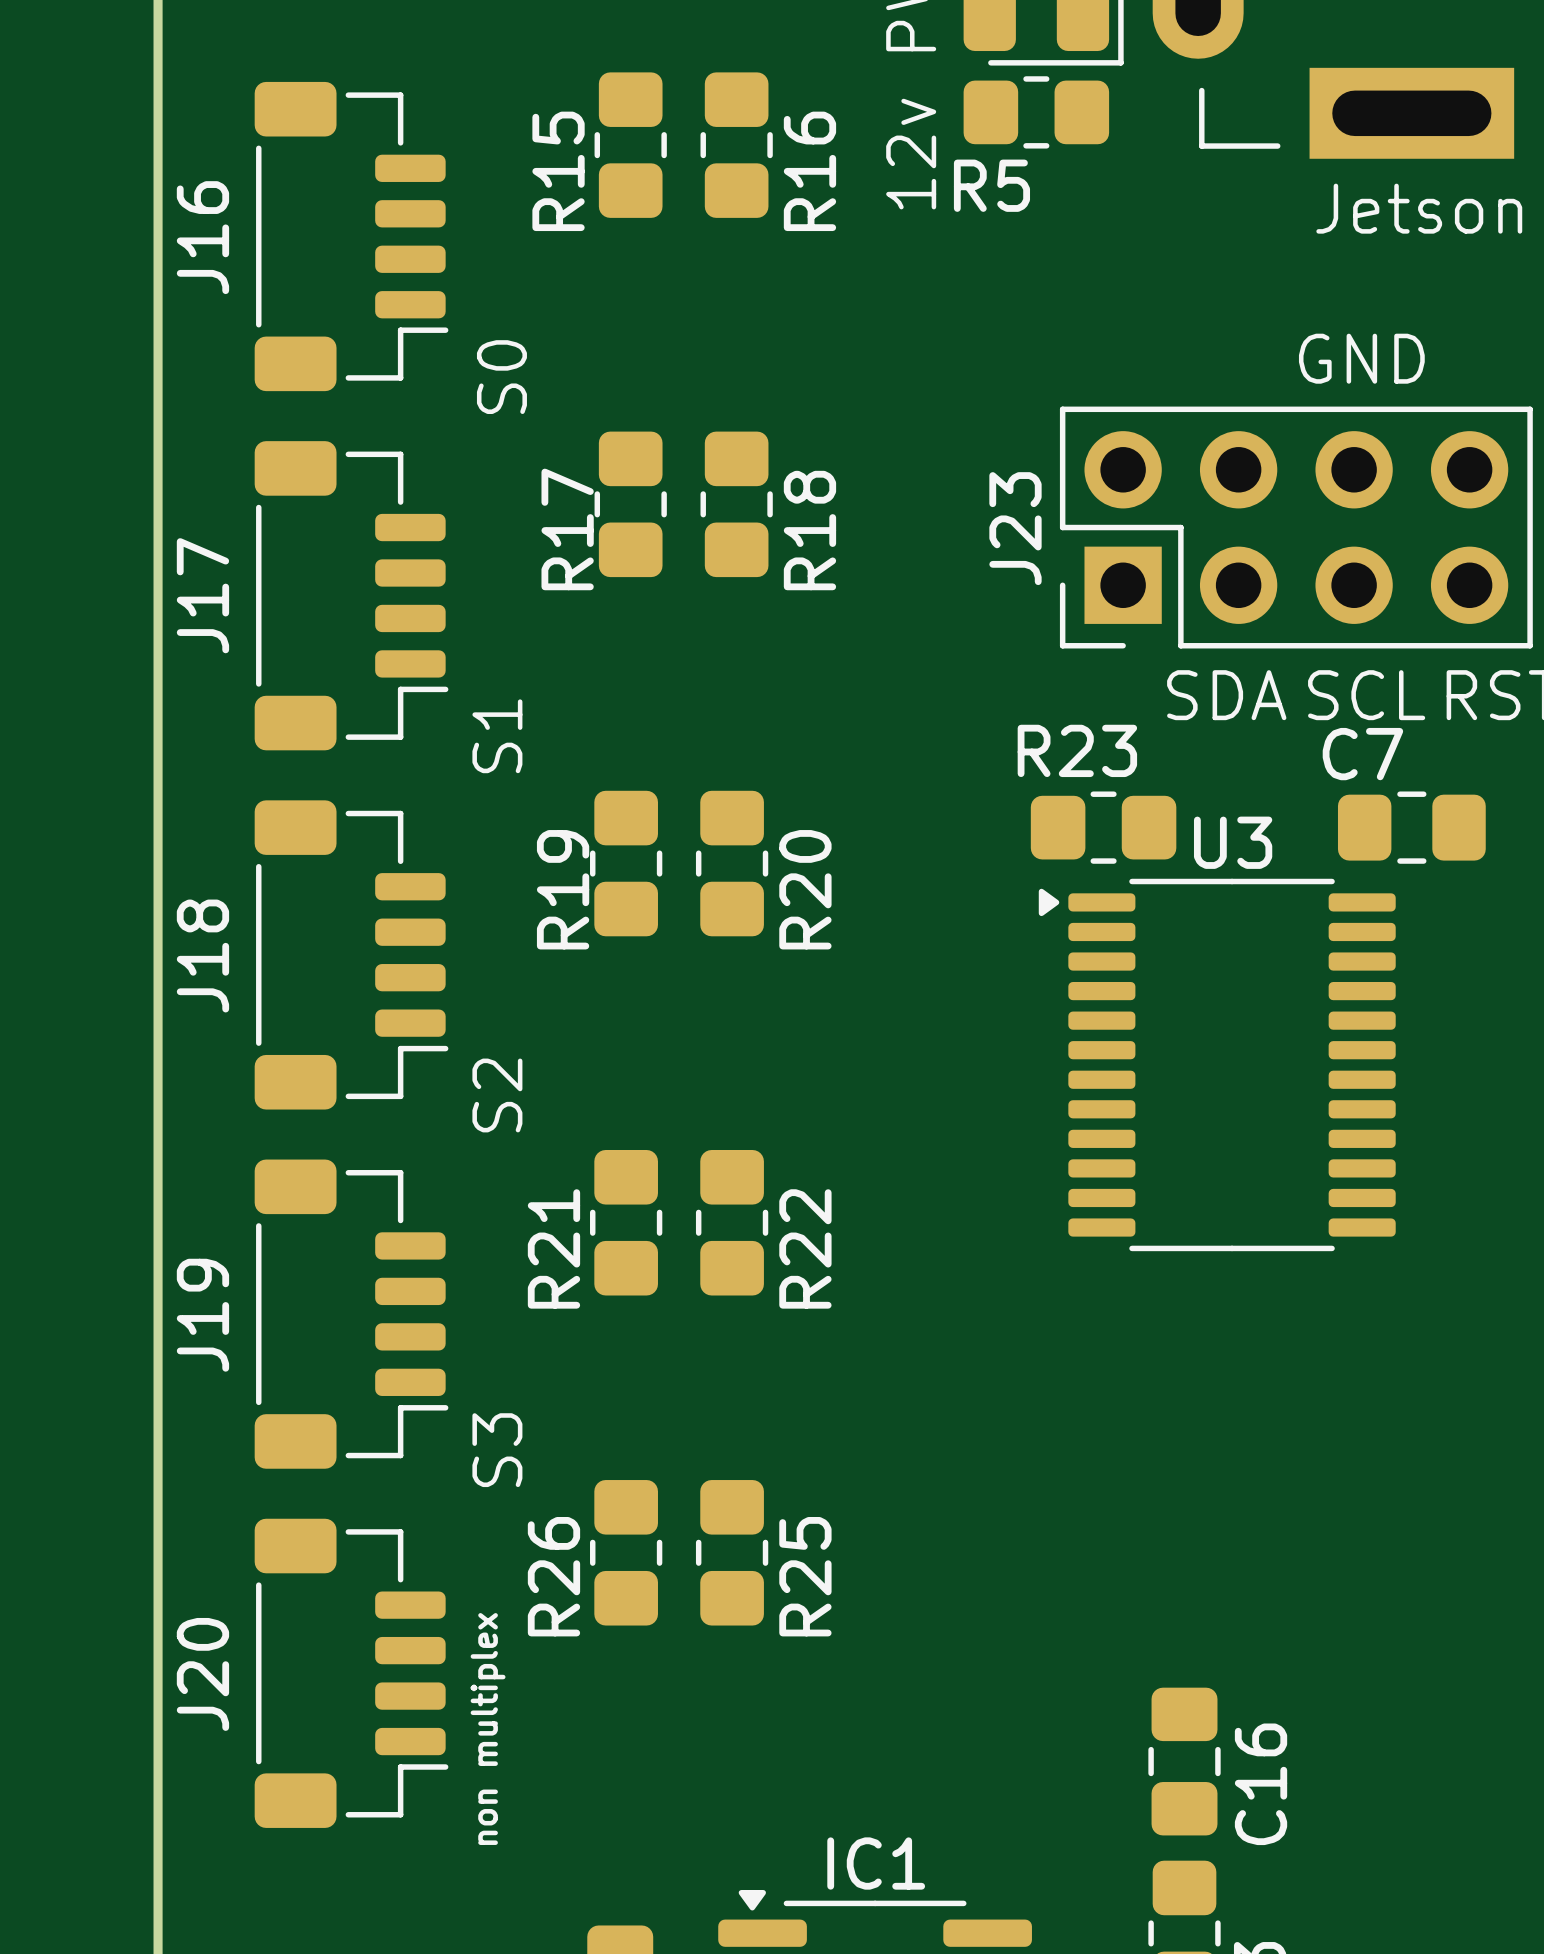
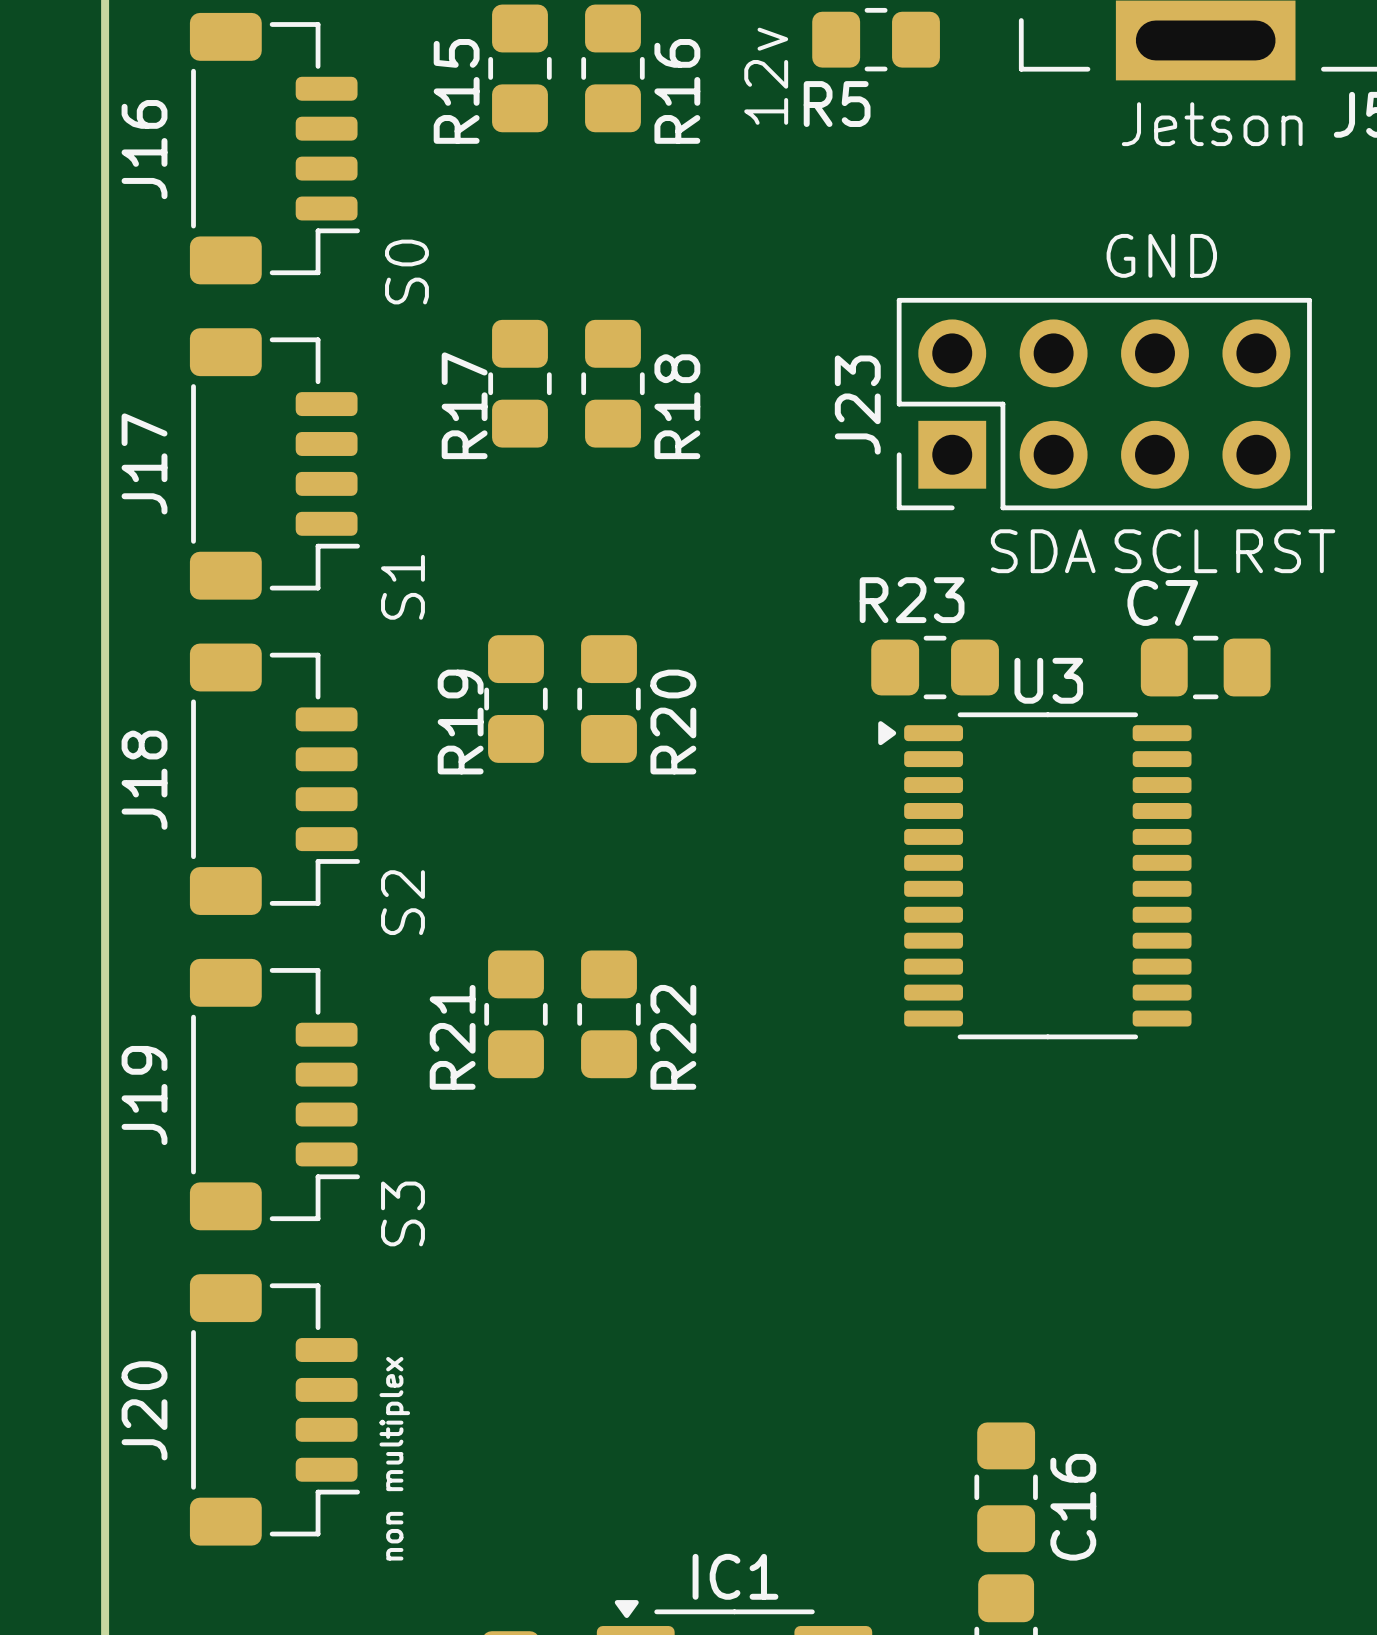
R26: (626, 1552) -> none
R25: (732, 1552) -> none

